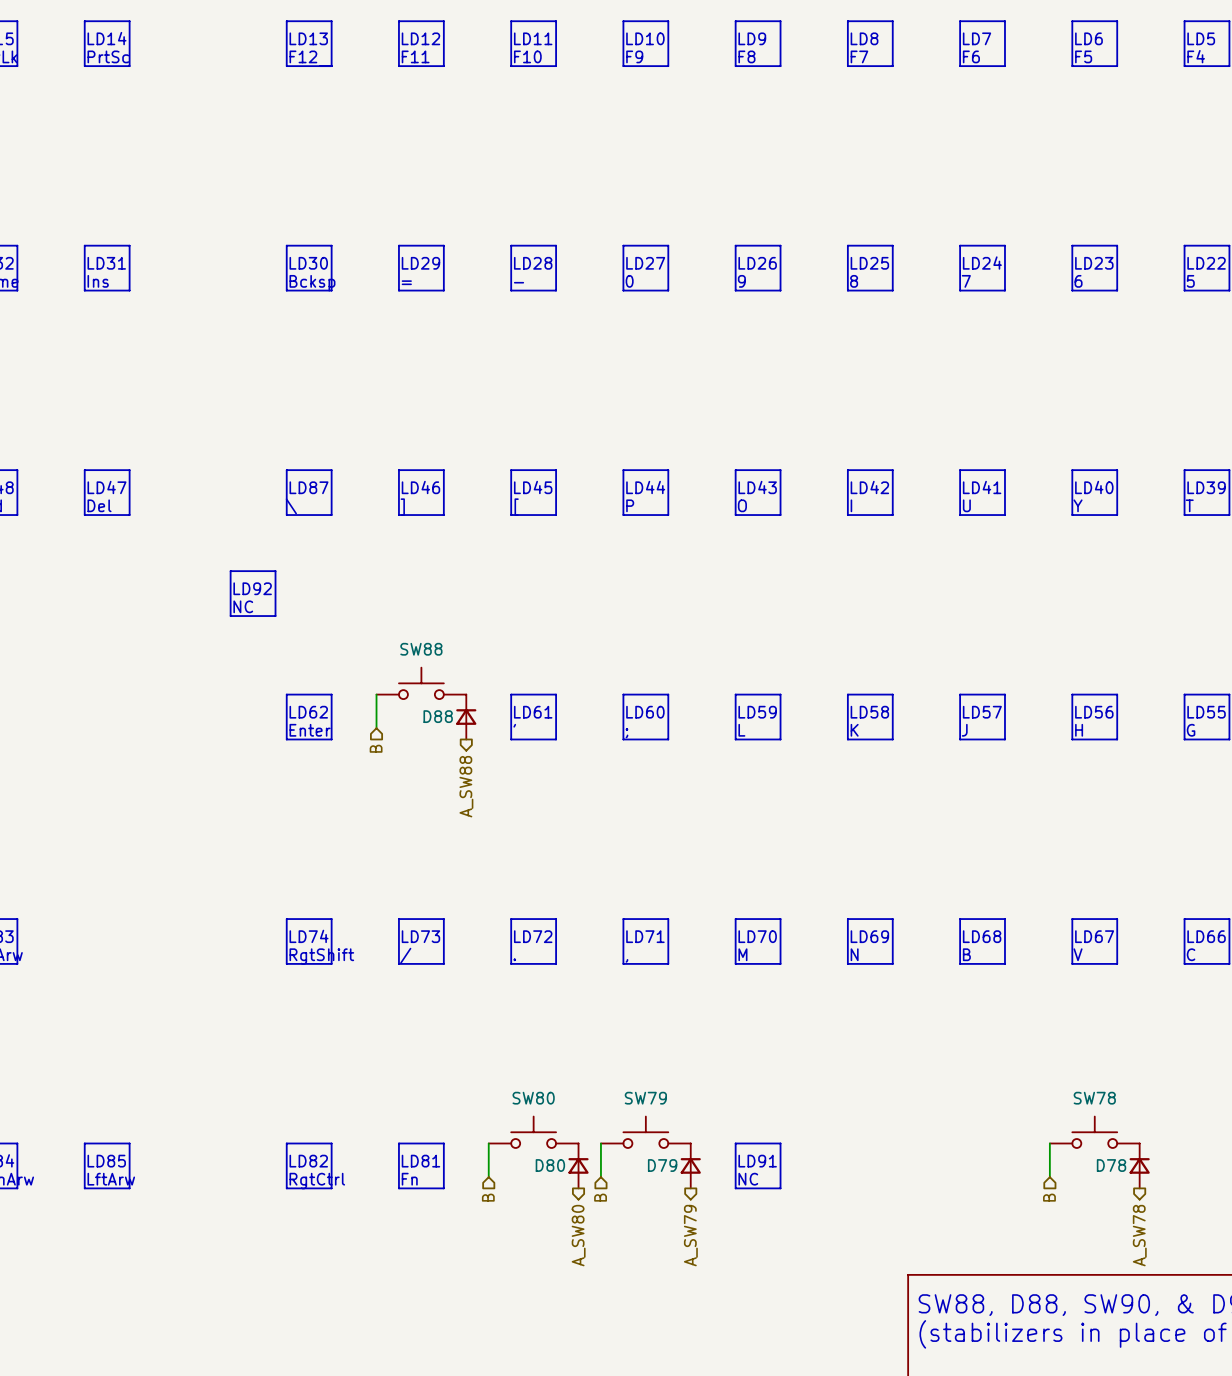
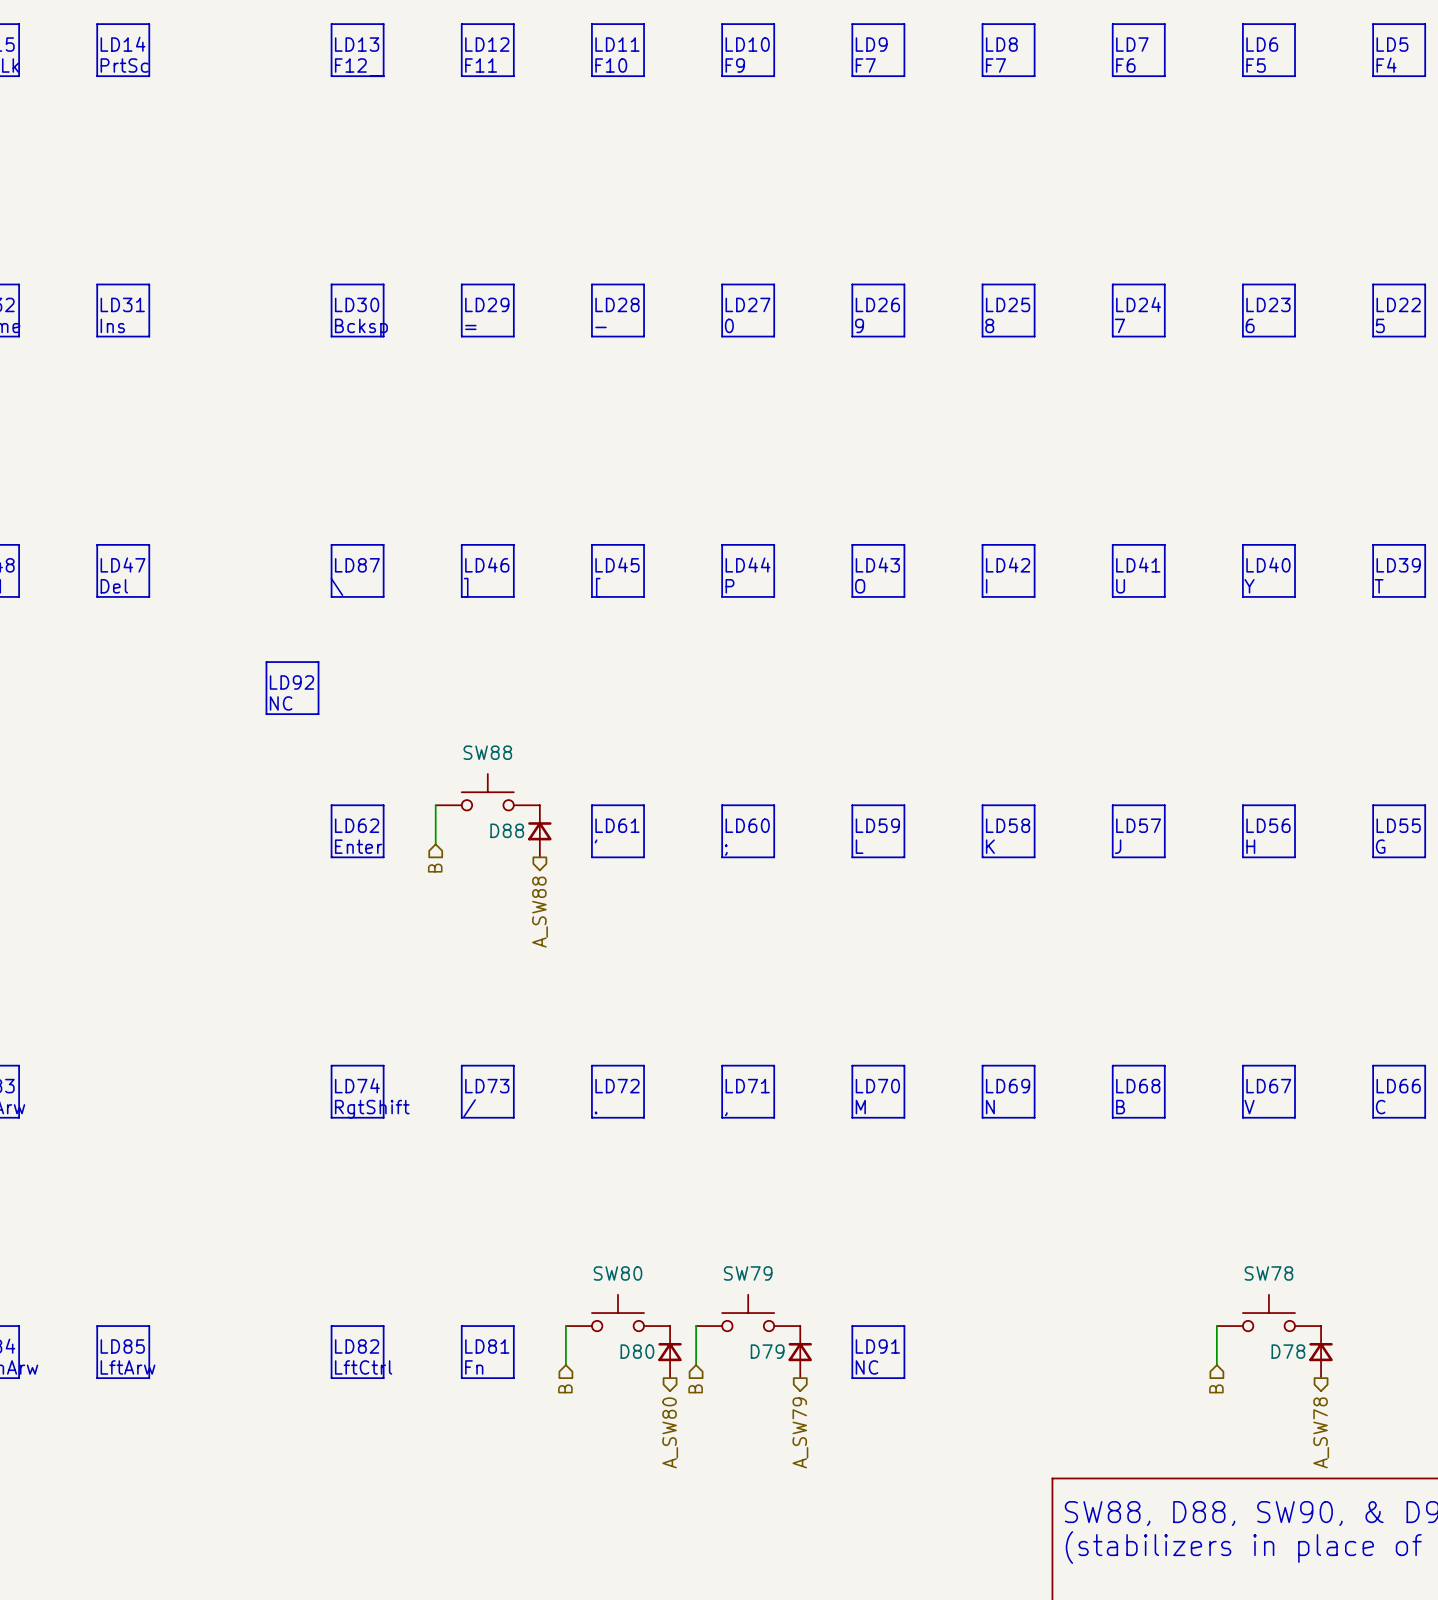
text: F8 (746, 56) -> F7 (865, 65)
text: RgtCtrl (317, 1181) -> LftCtrl (363, 1367)

